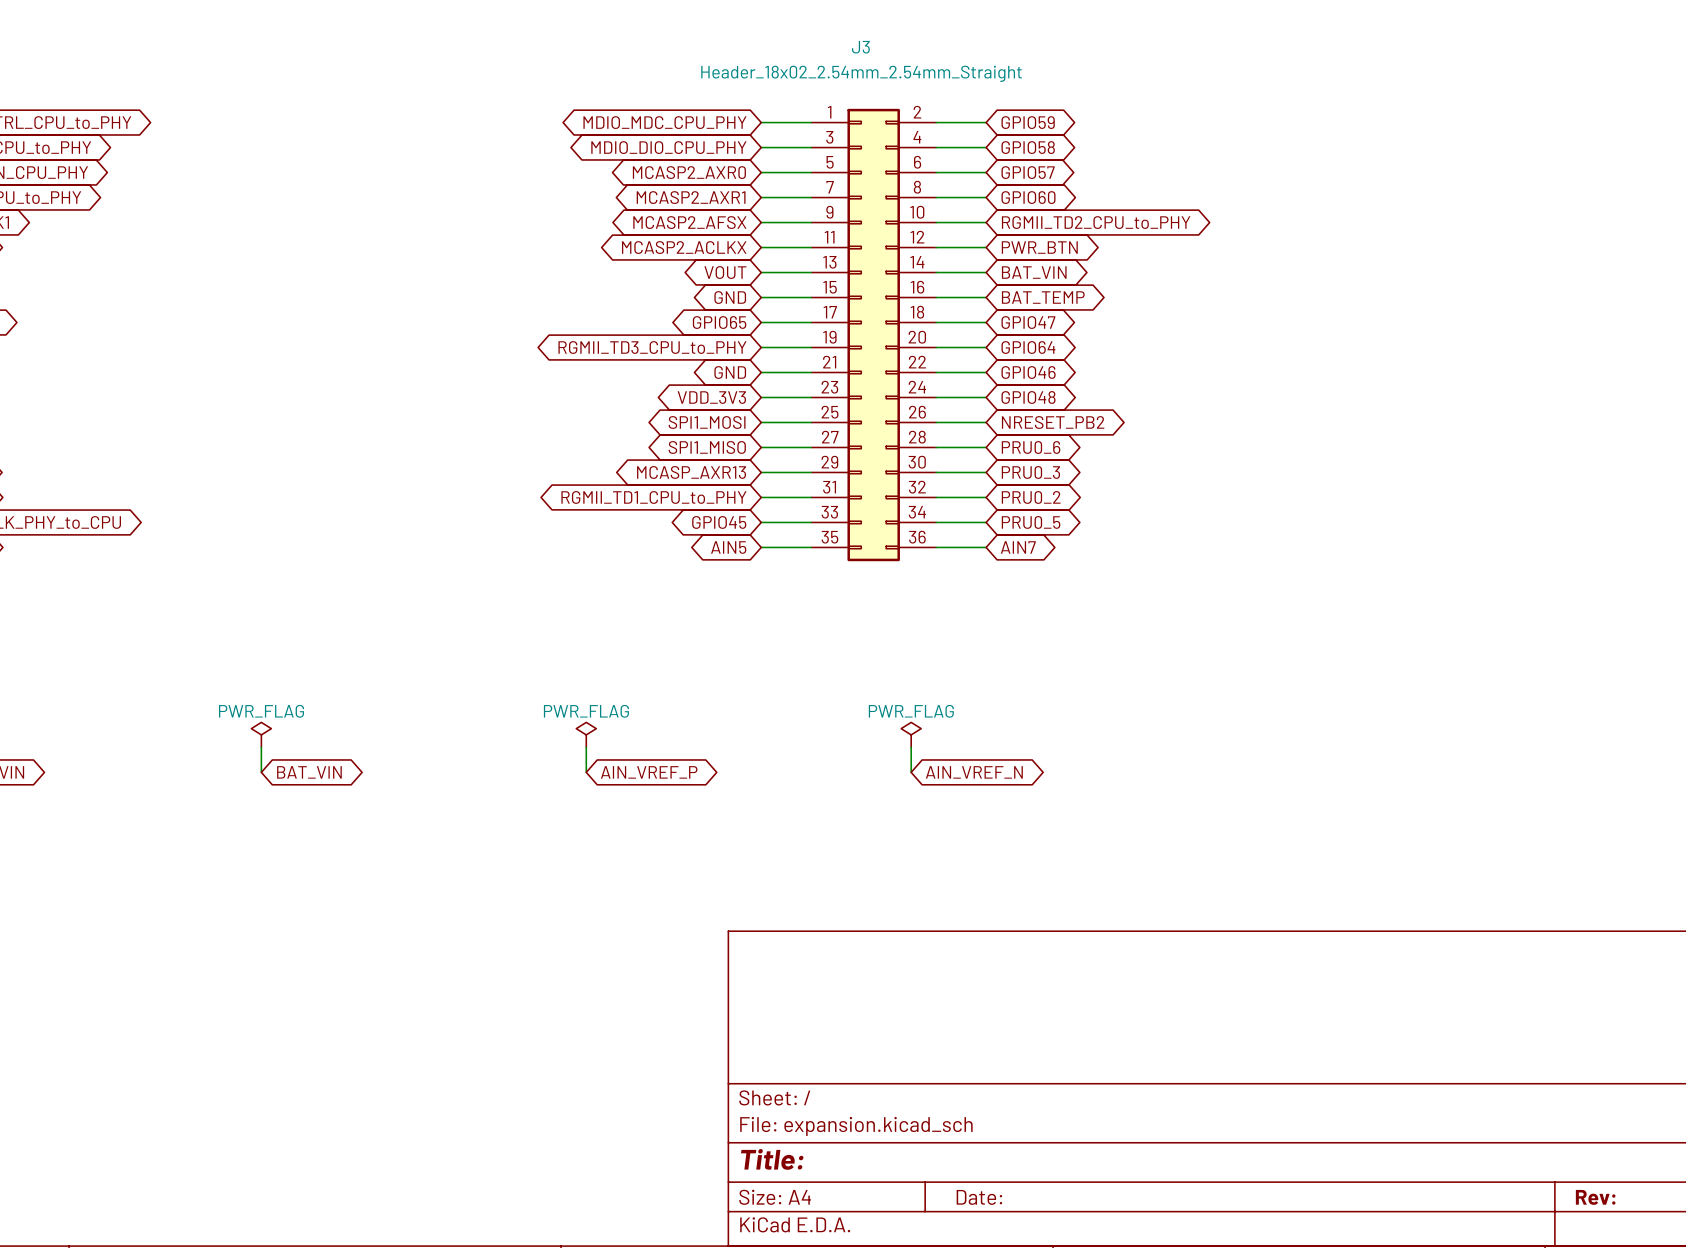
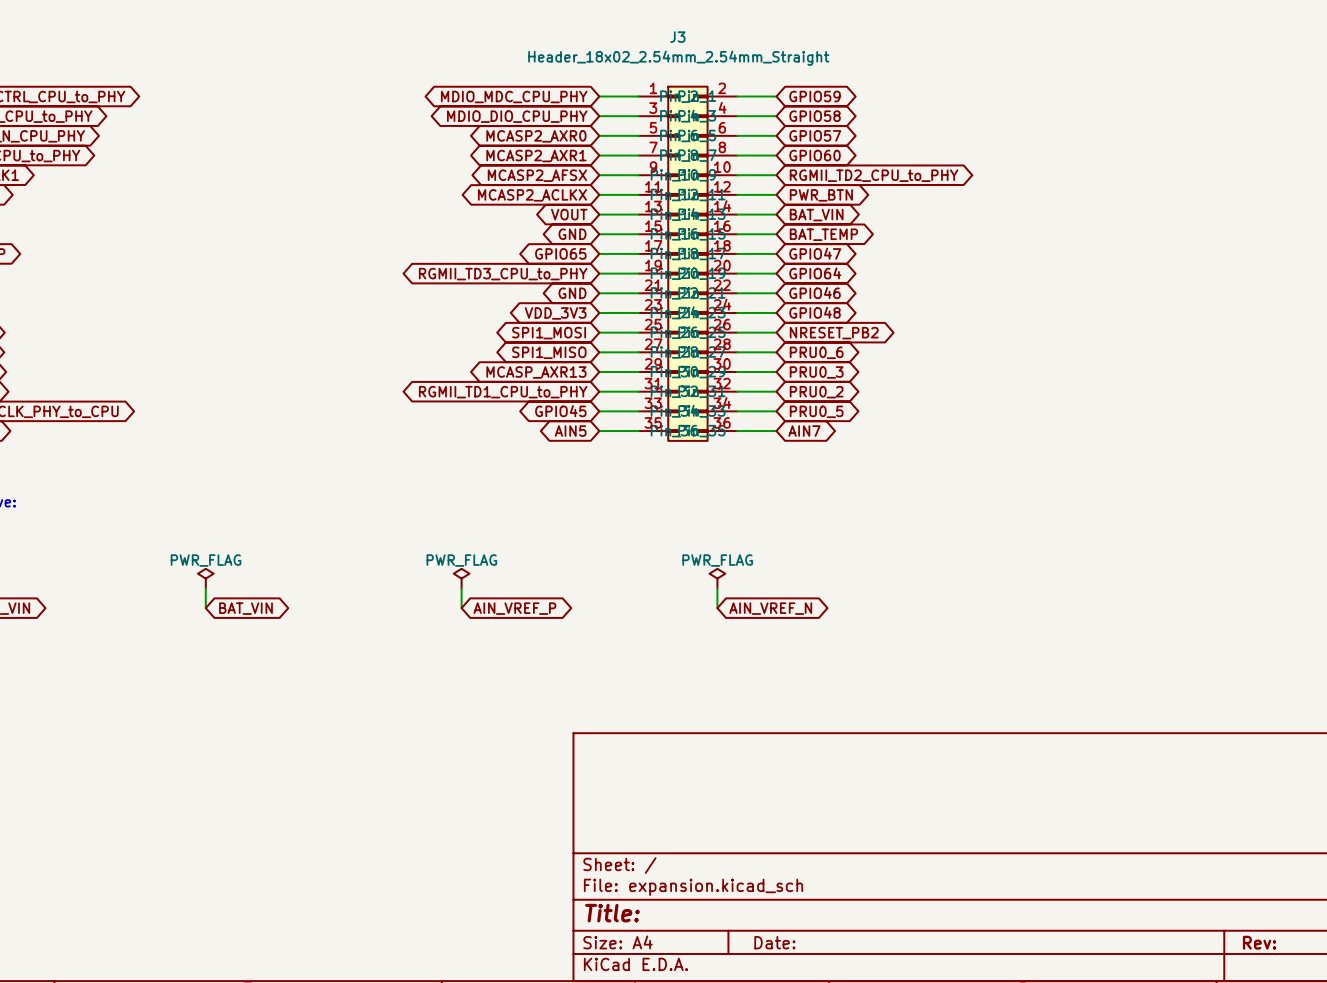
J3 symbol: [811, 108, 937, 562] -> [638, 85, 738, 442]

